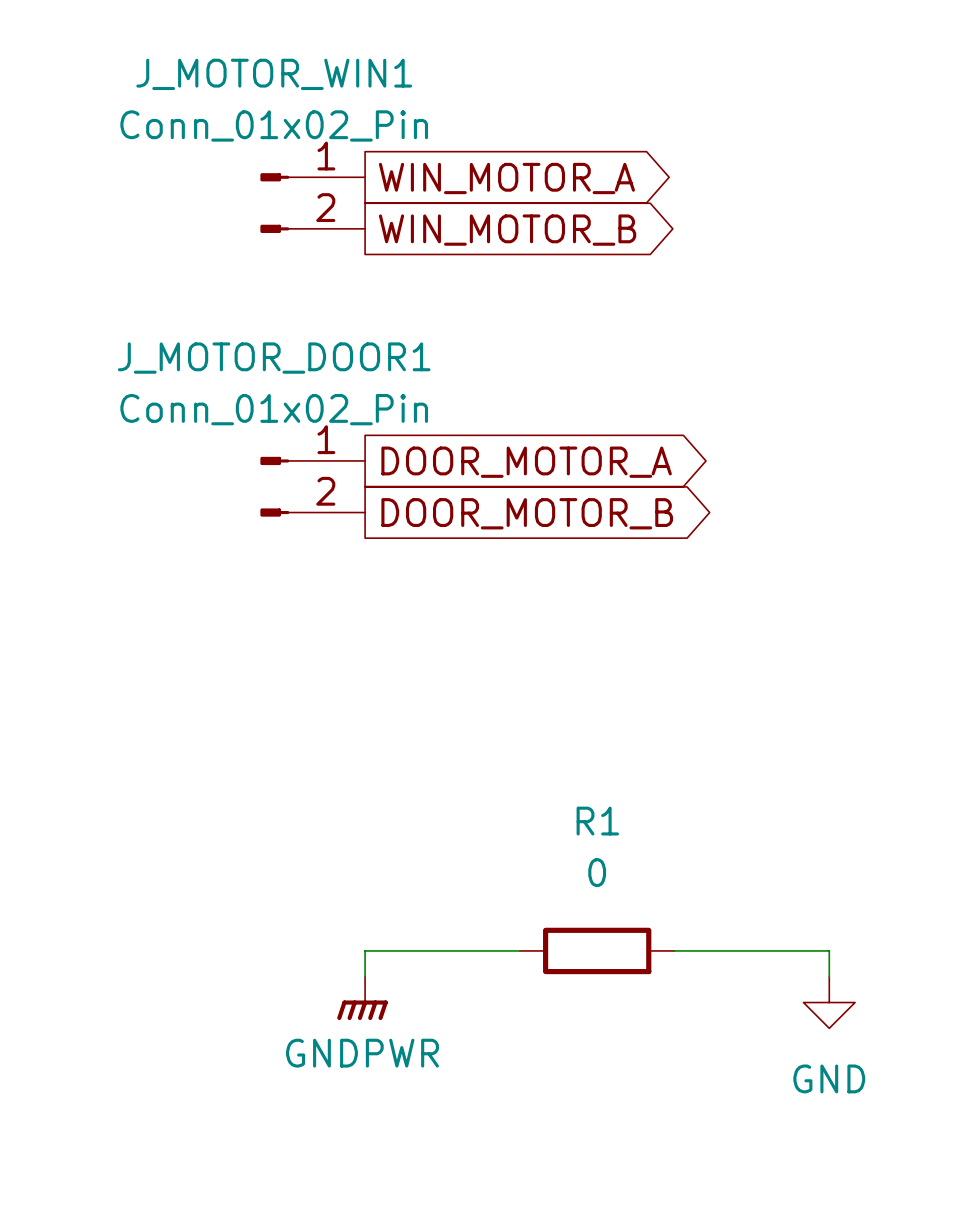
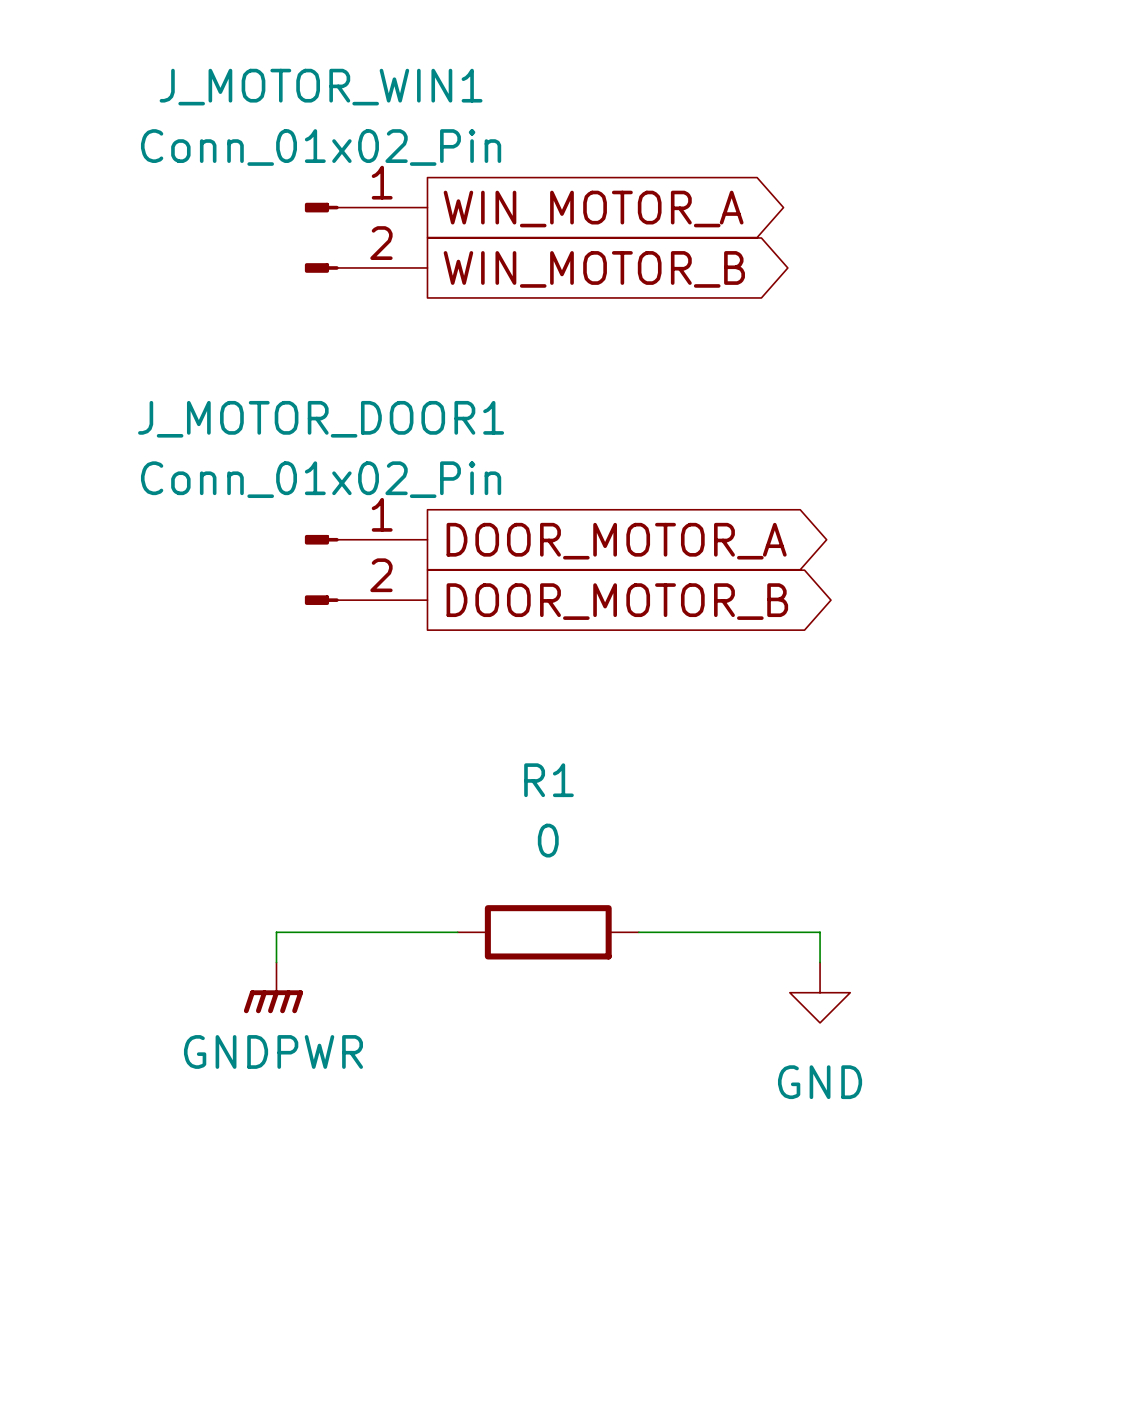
wire: (519, 950) (365, 950) (365, 976) -> (457, 932) (276, 932) (276, 962)
R1 position: (597, 950) -> (548, 932)
wire: (674, 950) (829, 950) (829, 976) -> (638, 932) (820, 932) (820, 962)
power symbol position: GNDPWR (362, 998) -> GNDPWR (273, 987)
power symbol position: GND (829, 1002) -> GND (820, 992)

